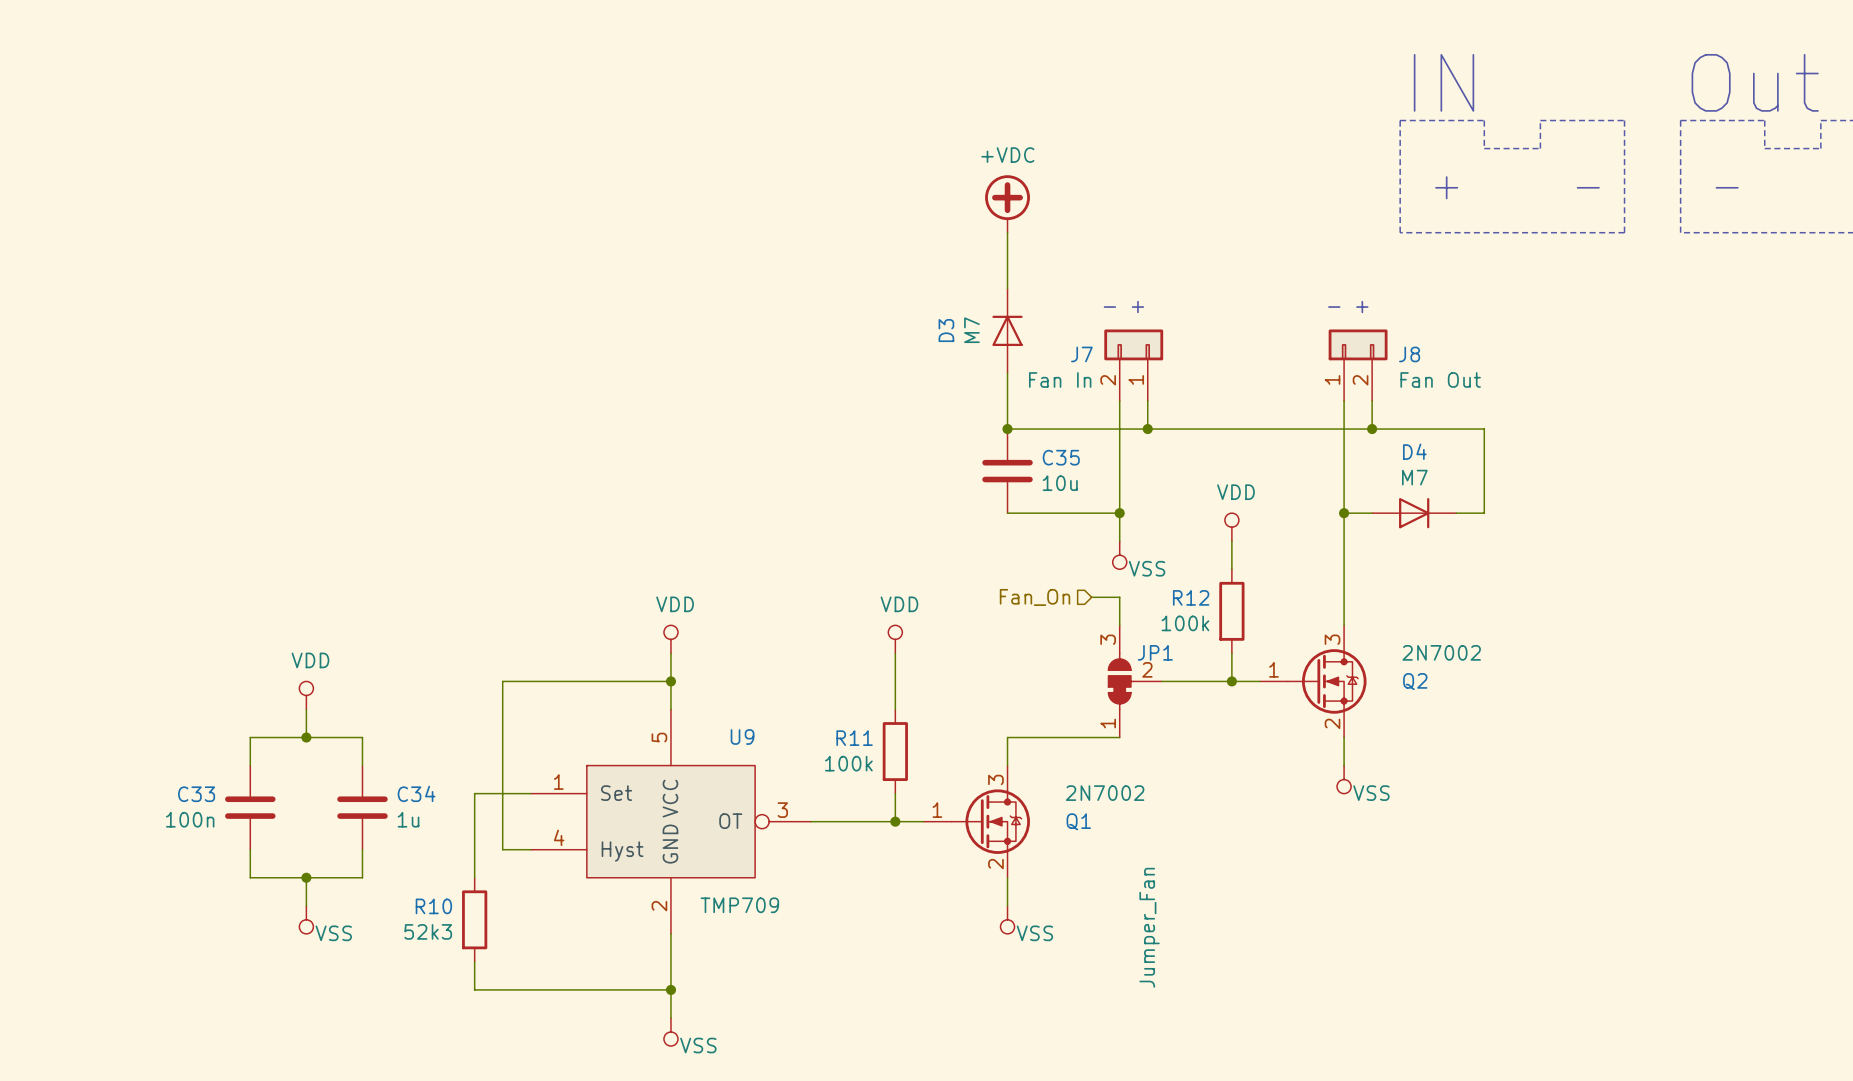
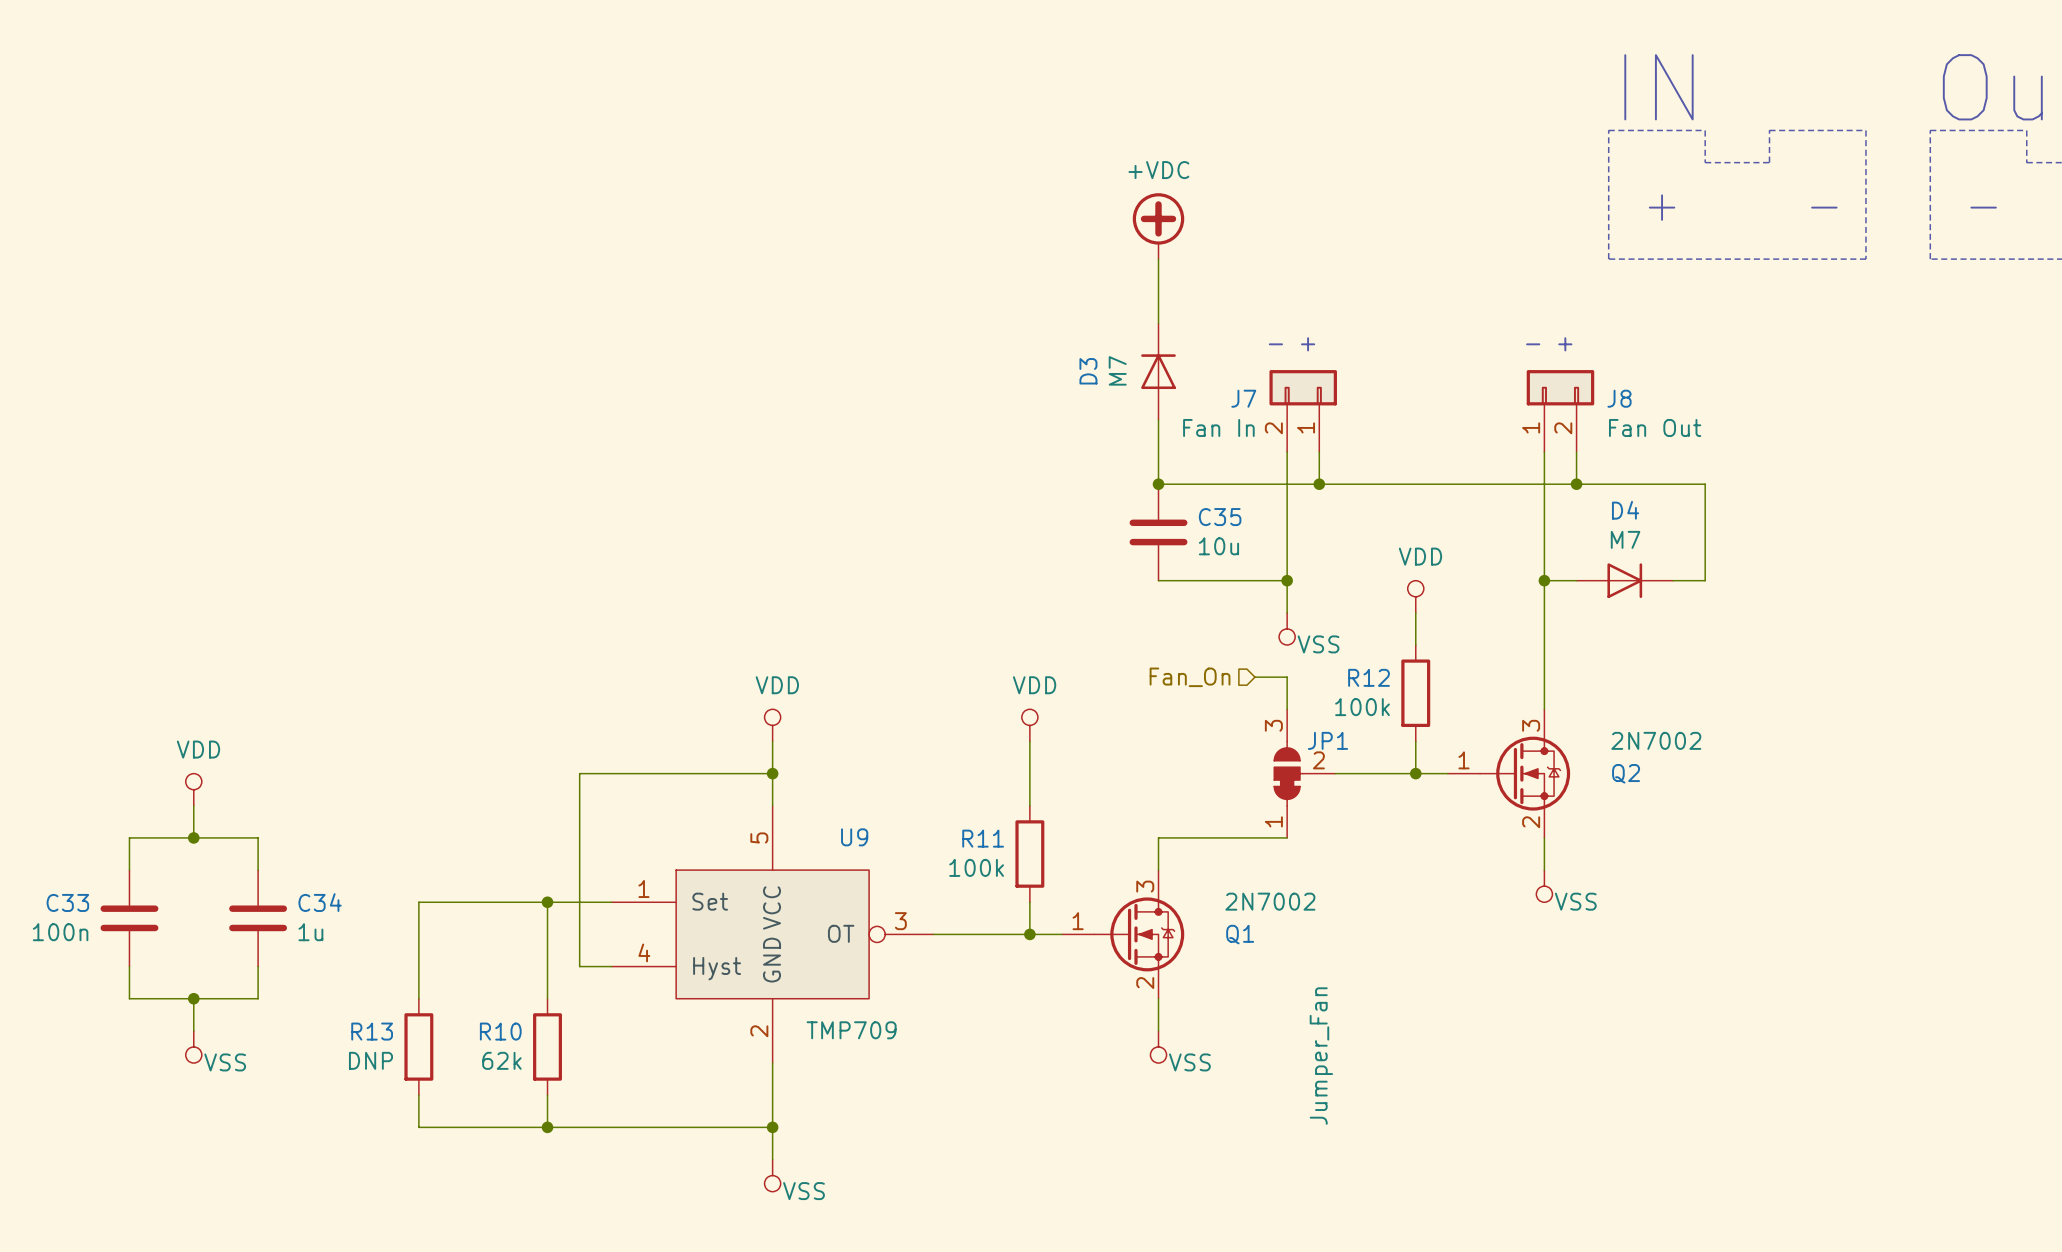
power symbol position: VDD (306, 695) -> VDD (193, 789)
wire: (306, 709) (306, 737) -> (193, 805) (193, 837)
junction: none -> (193, 837)
junction: (306, 737) -> none
wire: (250, 765) (250, 737) (362, 737) (362, 765) -> (129, 870) (129, 837) (258, 837) (258, 870)
wire: none -> (547, 902) (418, 902) (418, 966)
junction: none -> (547, 902)
C33 position: (250, 807) -> (129, 918)
C34 position: (362, 807) -> (258, 918)
wire: none -> (129, 966) (129, 998) (258, 998) (258, 966)
wire: (250, 849) (250, 877) (362, 877) -> (418, 1095) (418, 1127) (547, 1127)
junction: none -> (193, 998)
wire: (306, 877) (306, 905) -> (193, 998) (193, 1030)
junction: (306, 877) -> none
power symbol position: VSS (306, 919) -> VSS (193, 1046)
R13: none -> DNP (418, 1046)
R10 value: 52k3 (428, 931) -> 62k (501, 1060)
junction: none -> (547, 1127)

